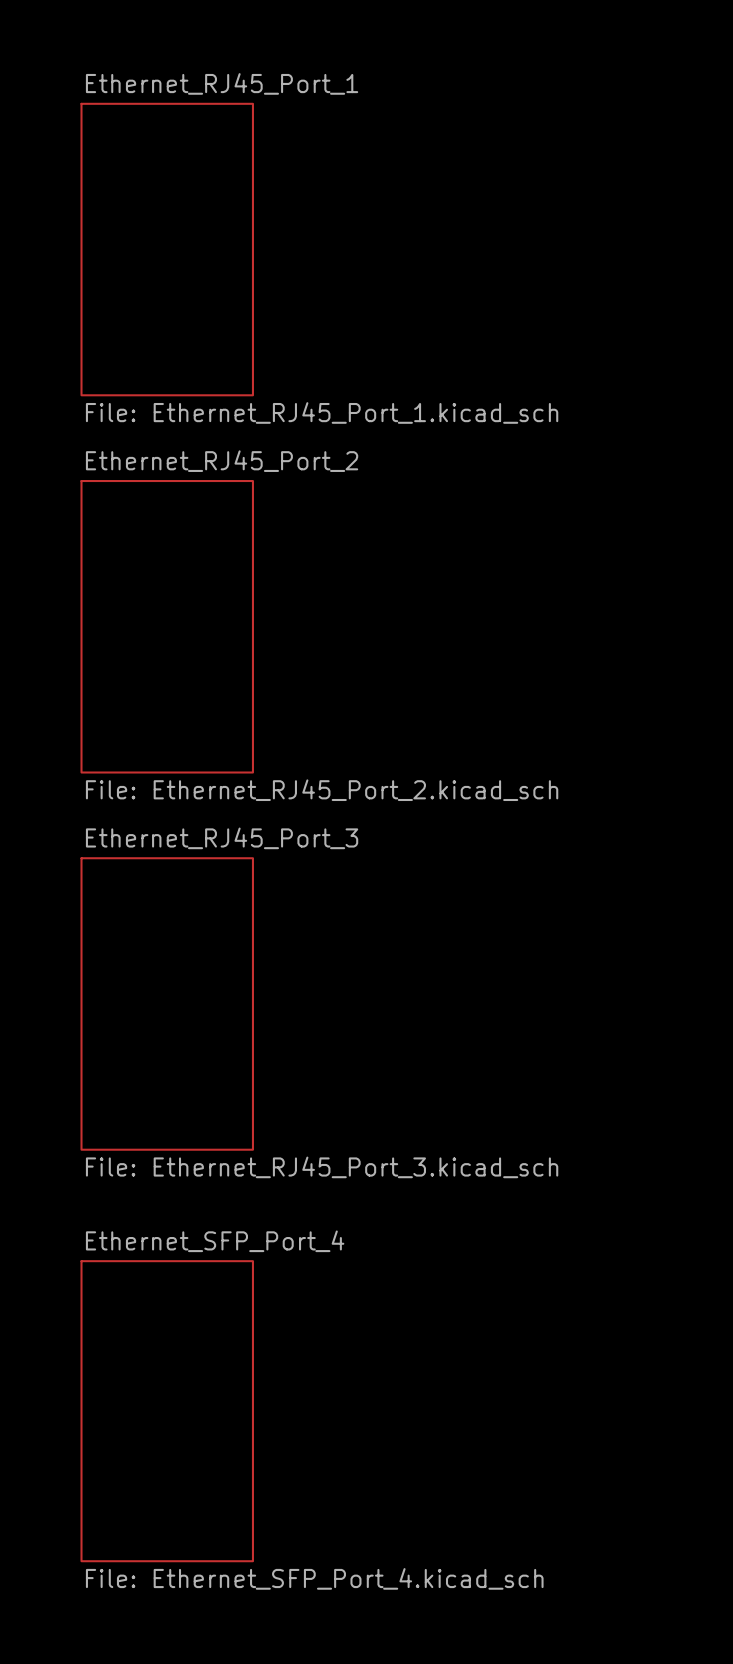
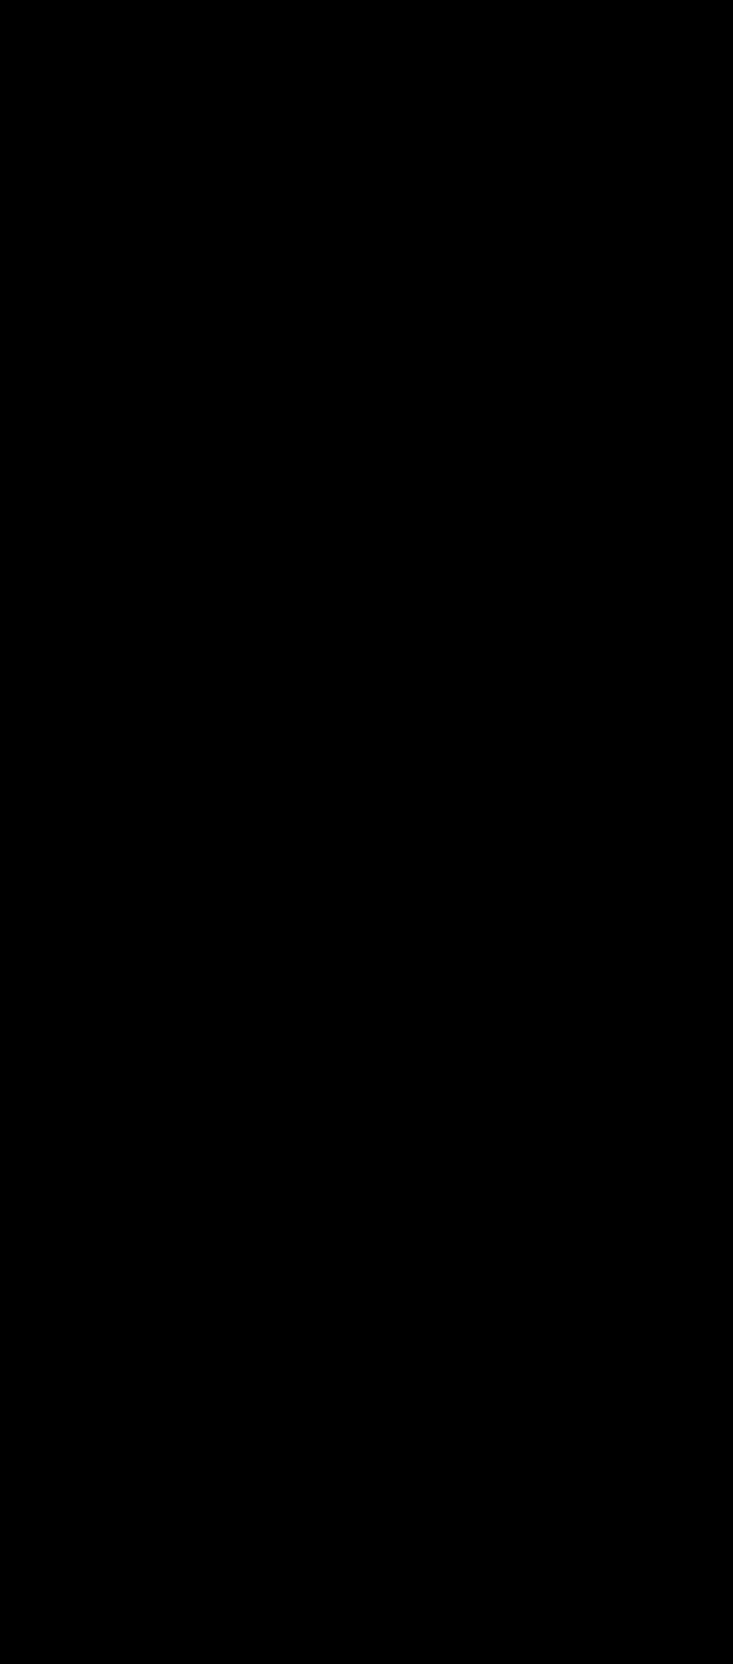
sheet Ethernet_RJ45_Port_1: File: Ethernet_RJ45_Port_1.kicad_sch (167, 249) -> none
sheet Ethernet_RJ45_Port_2: File: Ethernet_RJ45_Port_2.kicad_sch (167, 626) -> none
sheet Ethernet_RJ45_Port_3: File: Ethernet_RJ45_Port_3.kicad_sch (167, 1003) -> none
sheet Ethernet_SFP_Port_4: File: Ethernet_SFP_Port_4.kicad_sch (167, 1411) -> none

